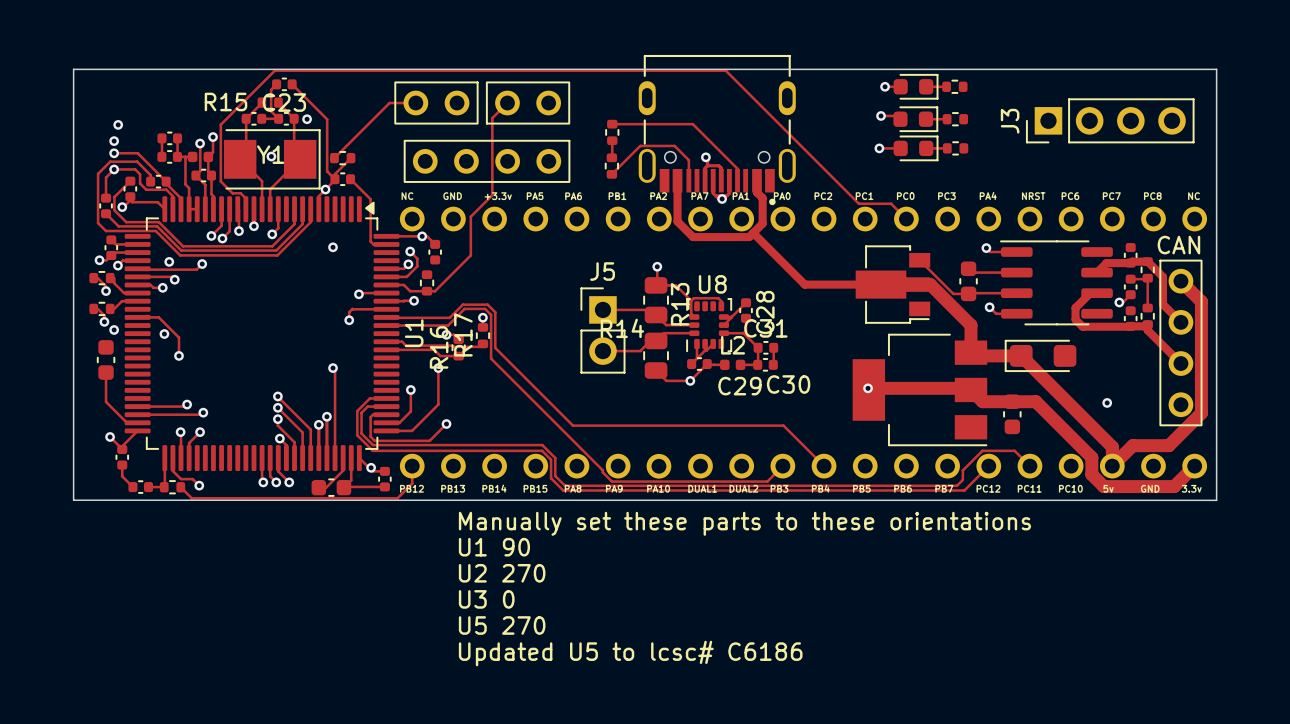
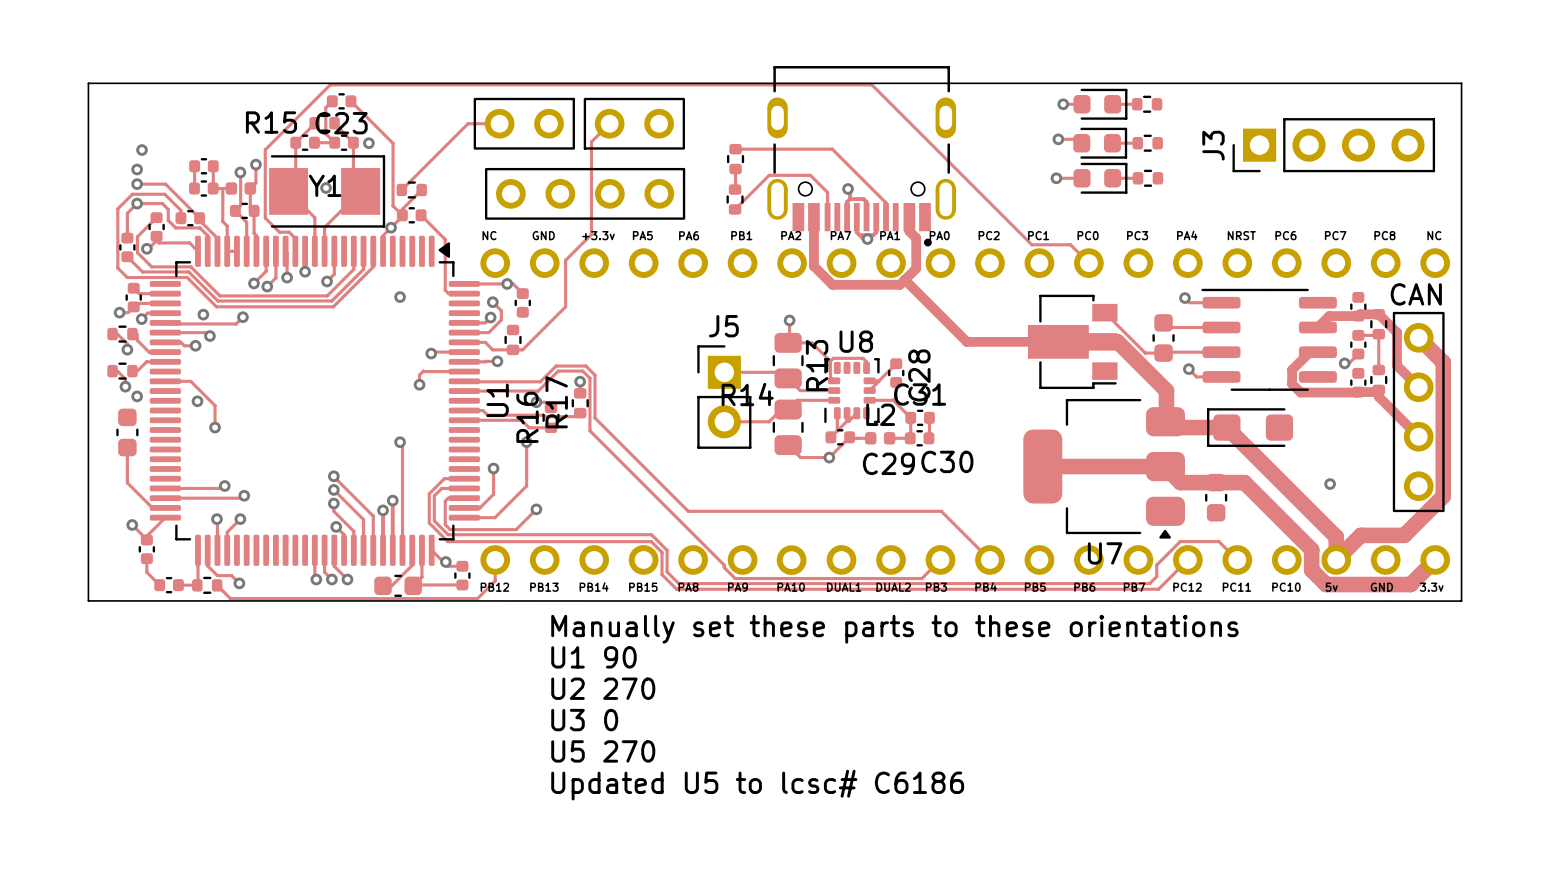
via: (868, 388) -> none
part: (920, 389) -> none
U7: none -> (1104, 468)

